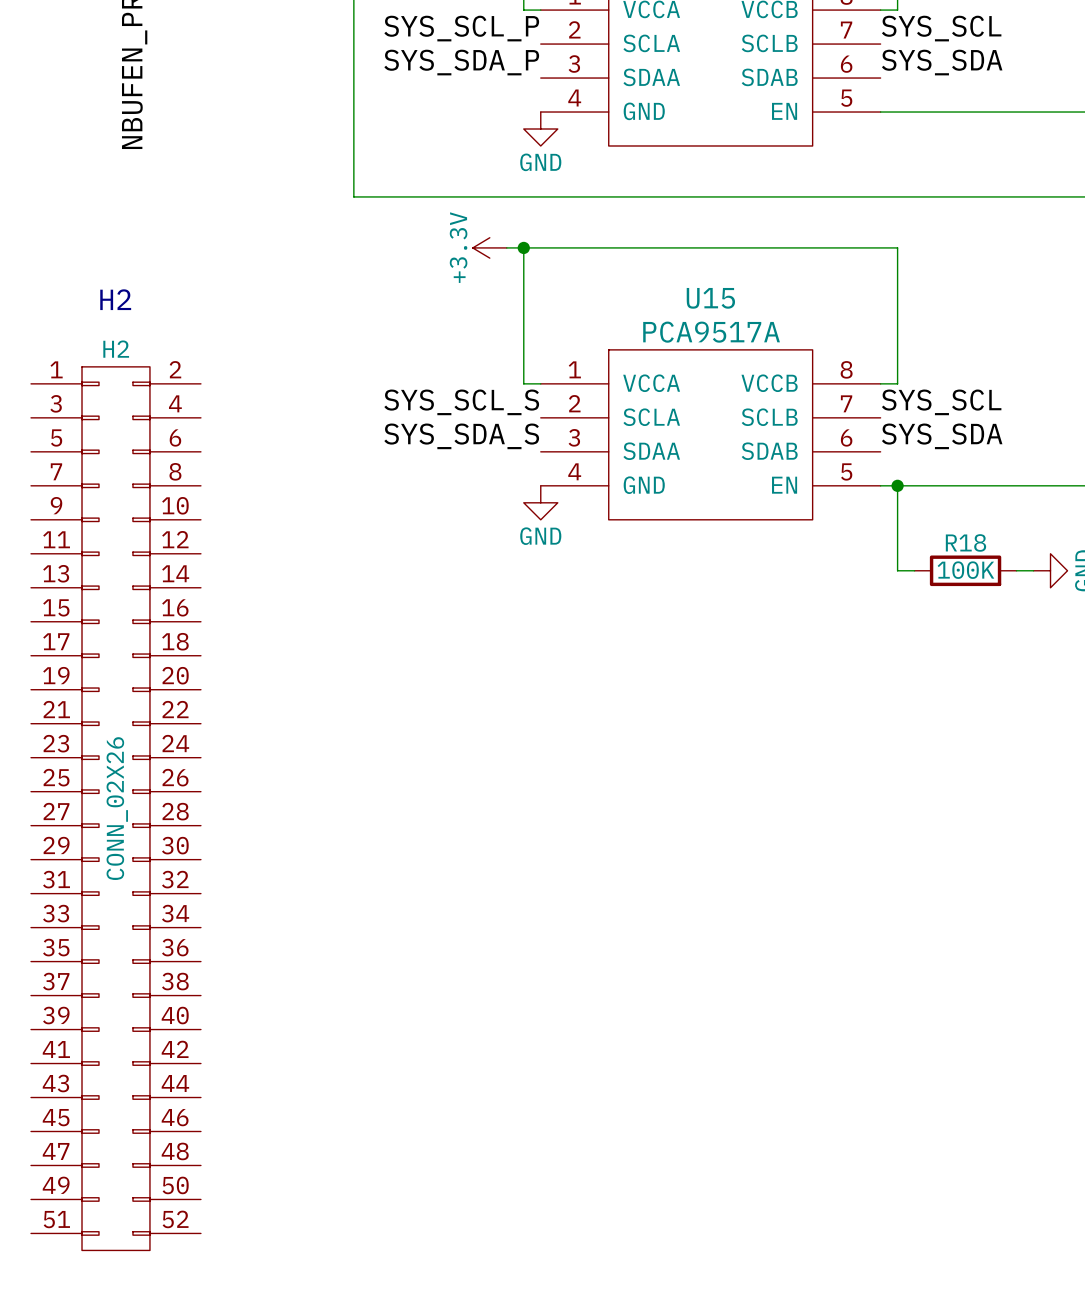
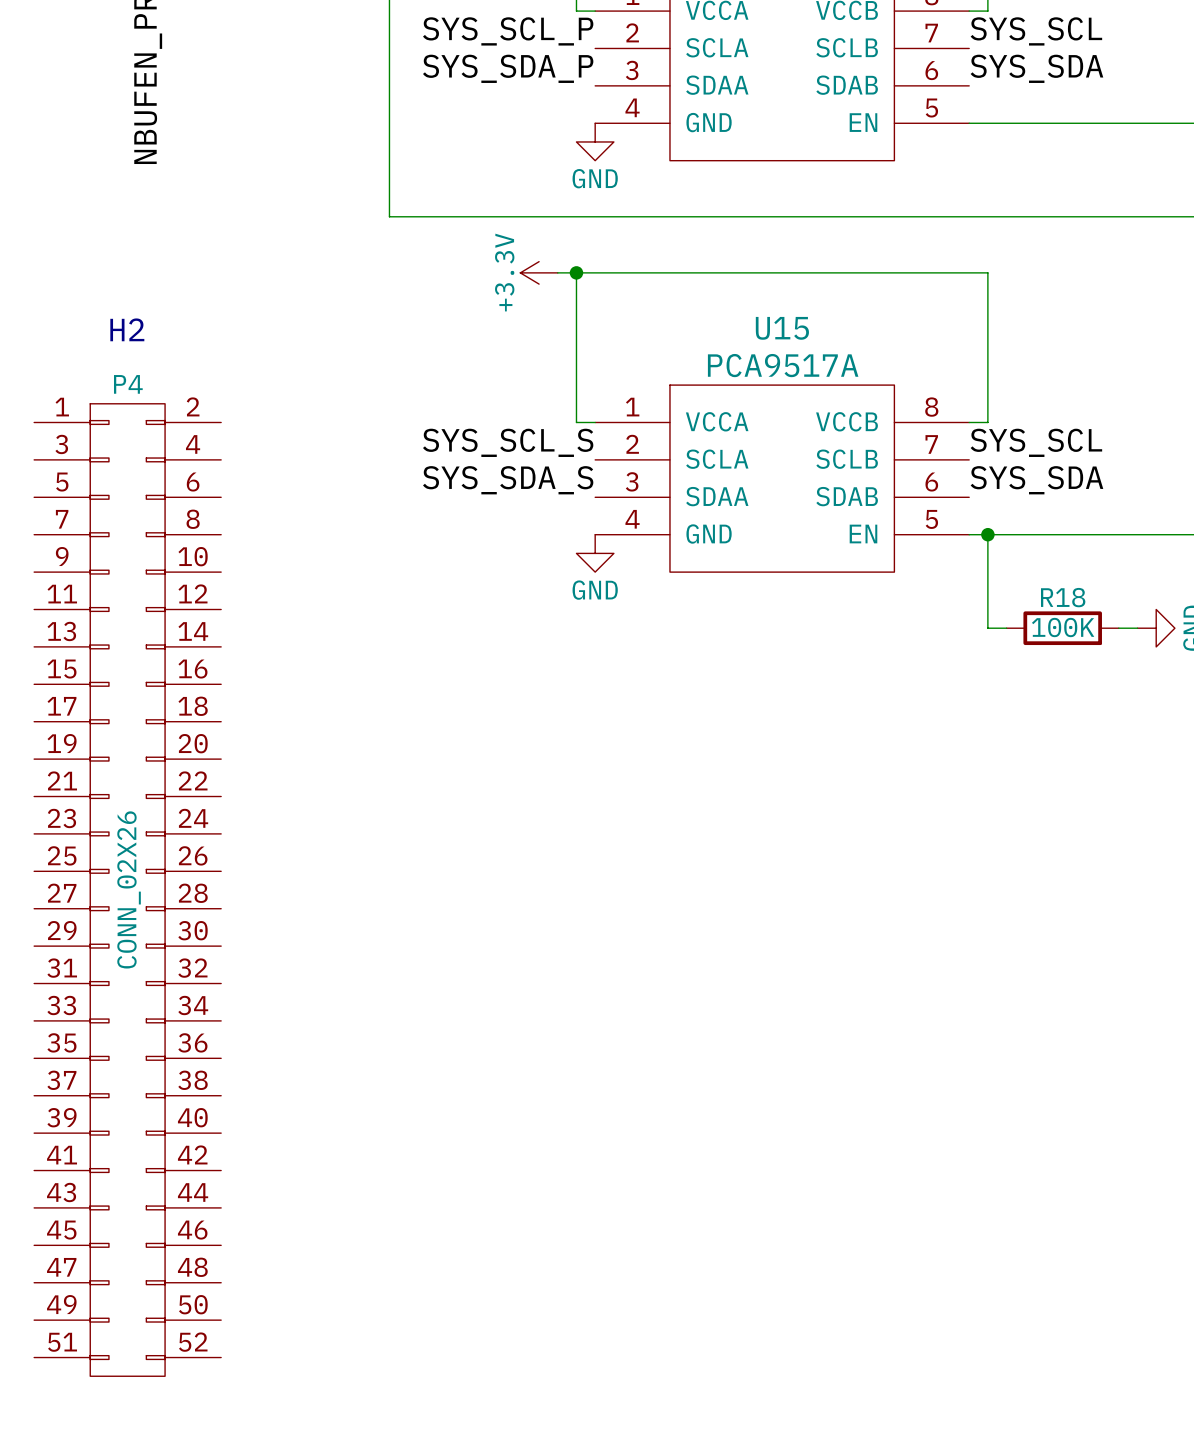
H2 name: H2 (116, 349) -> P4 (128, 384)

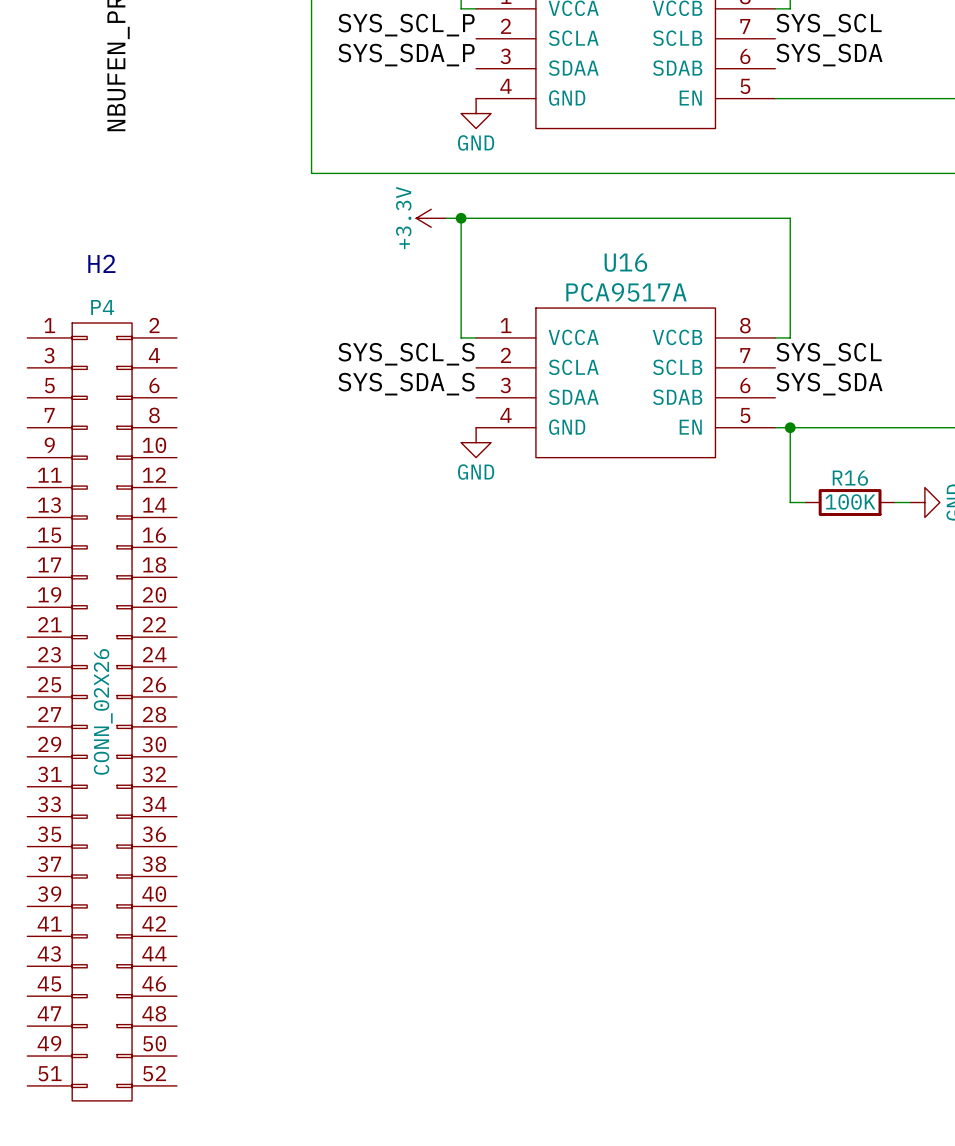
U15 name: U15 (782, 328) -> U16 (625, 262)
R18 name: R18 (1063, 597) -> R16 (850, 478)

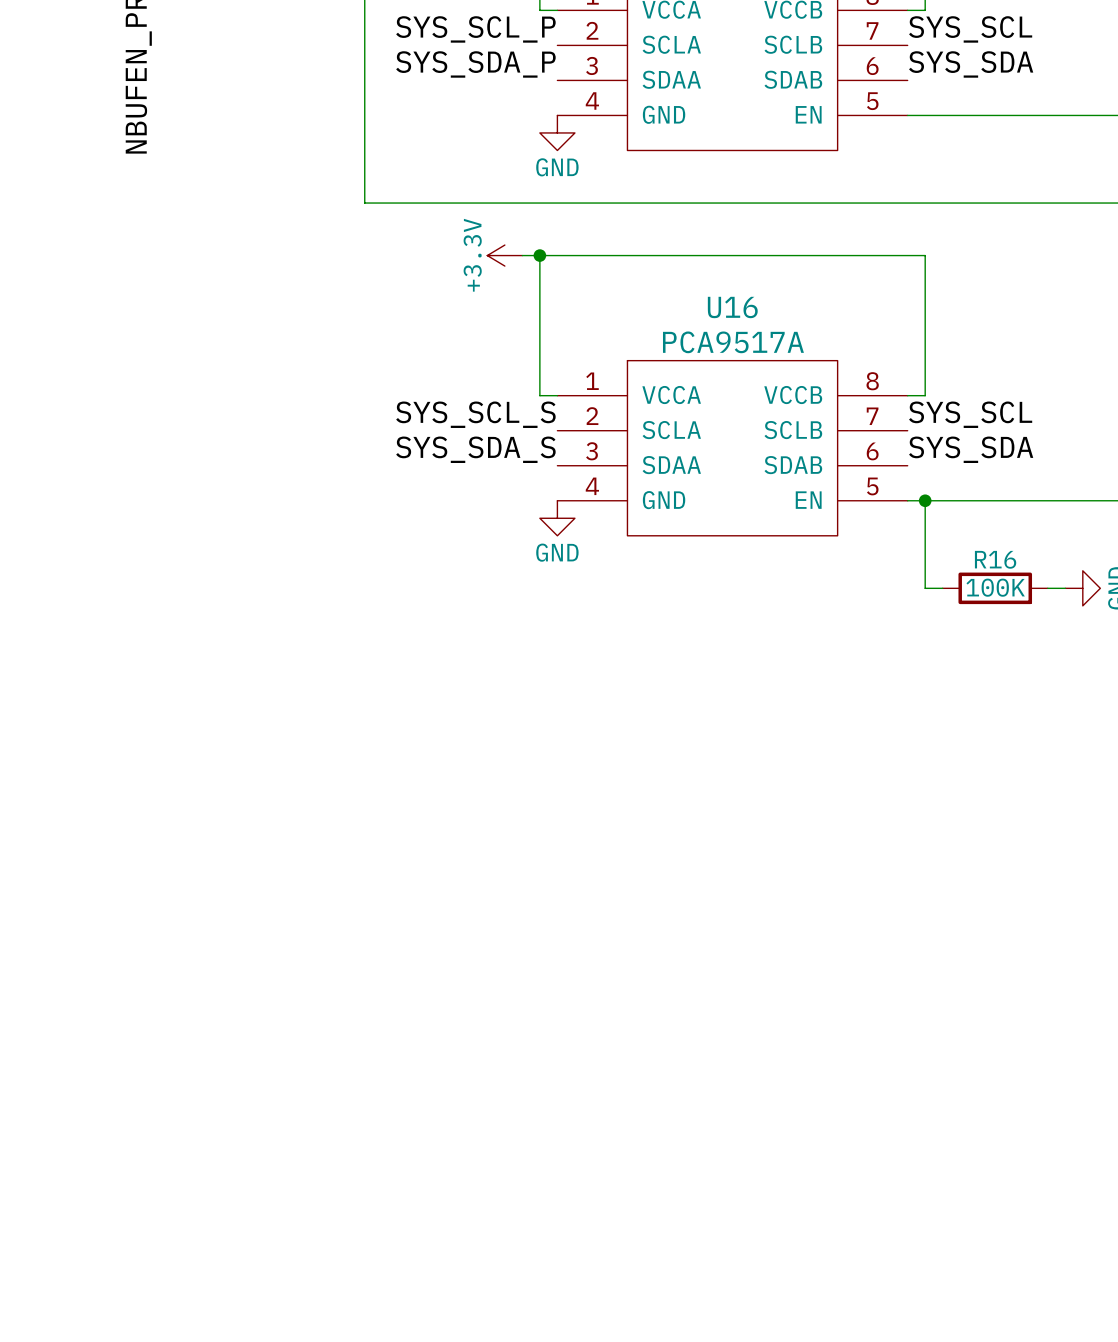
text: H2 (101, 263) -> none
P4: CONN_02X26 (102, 711) -> none

